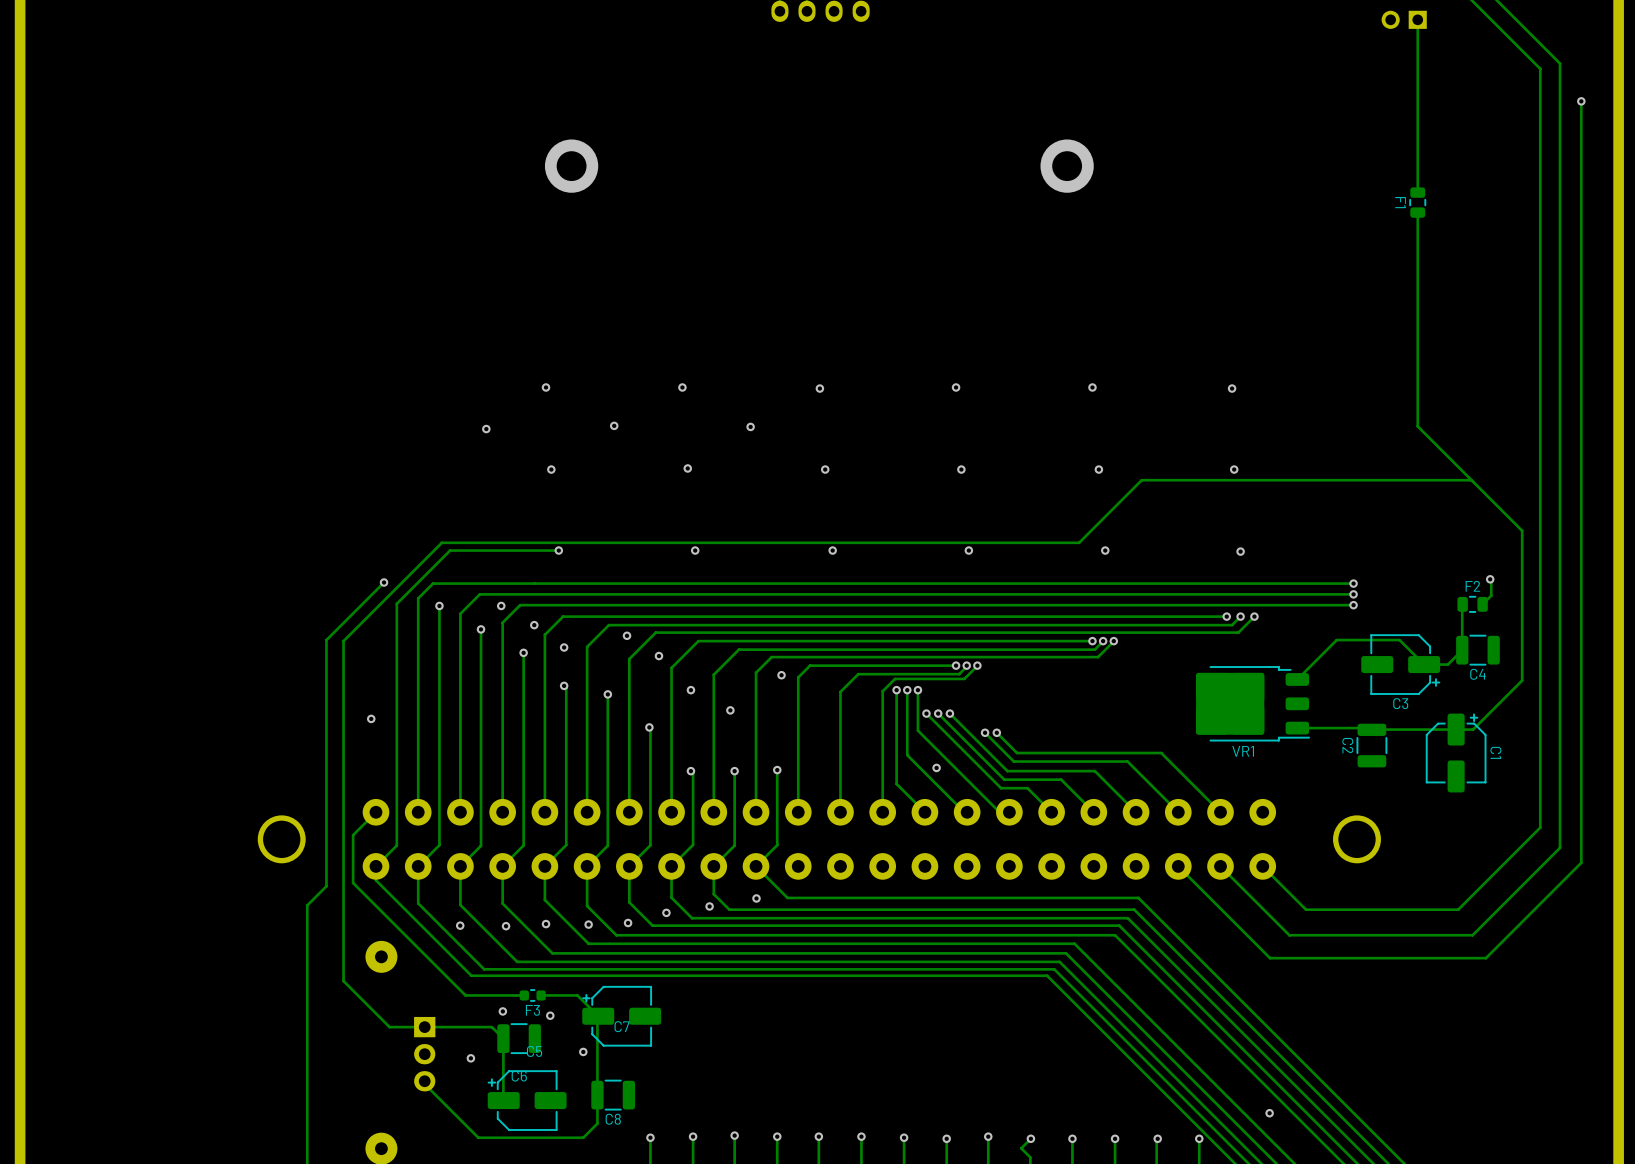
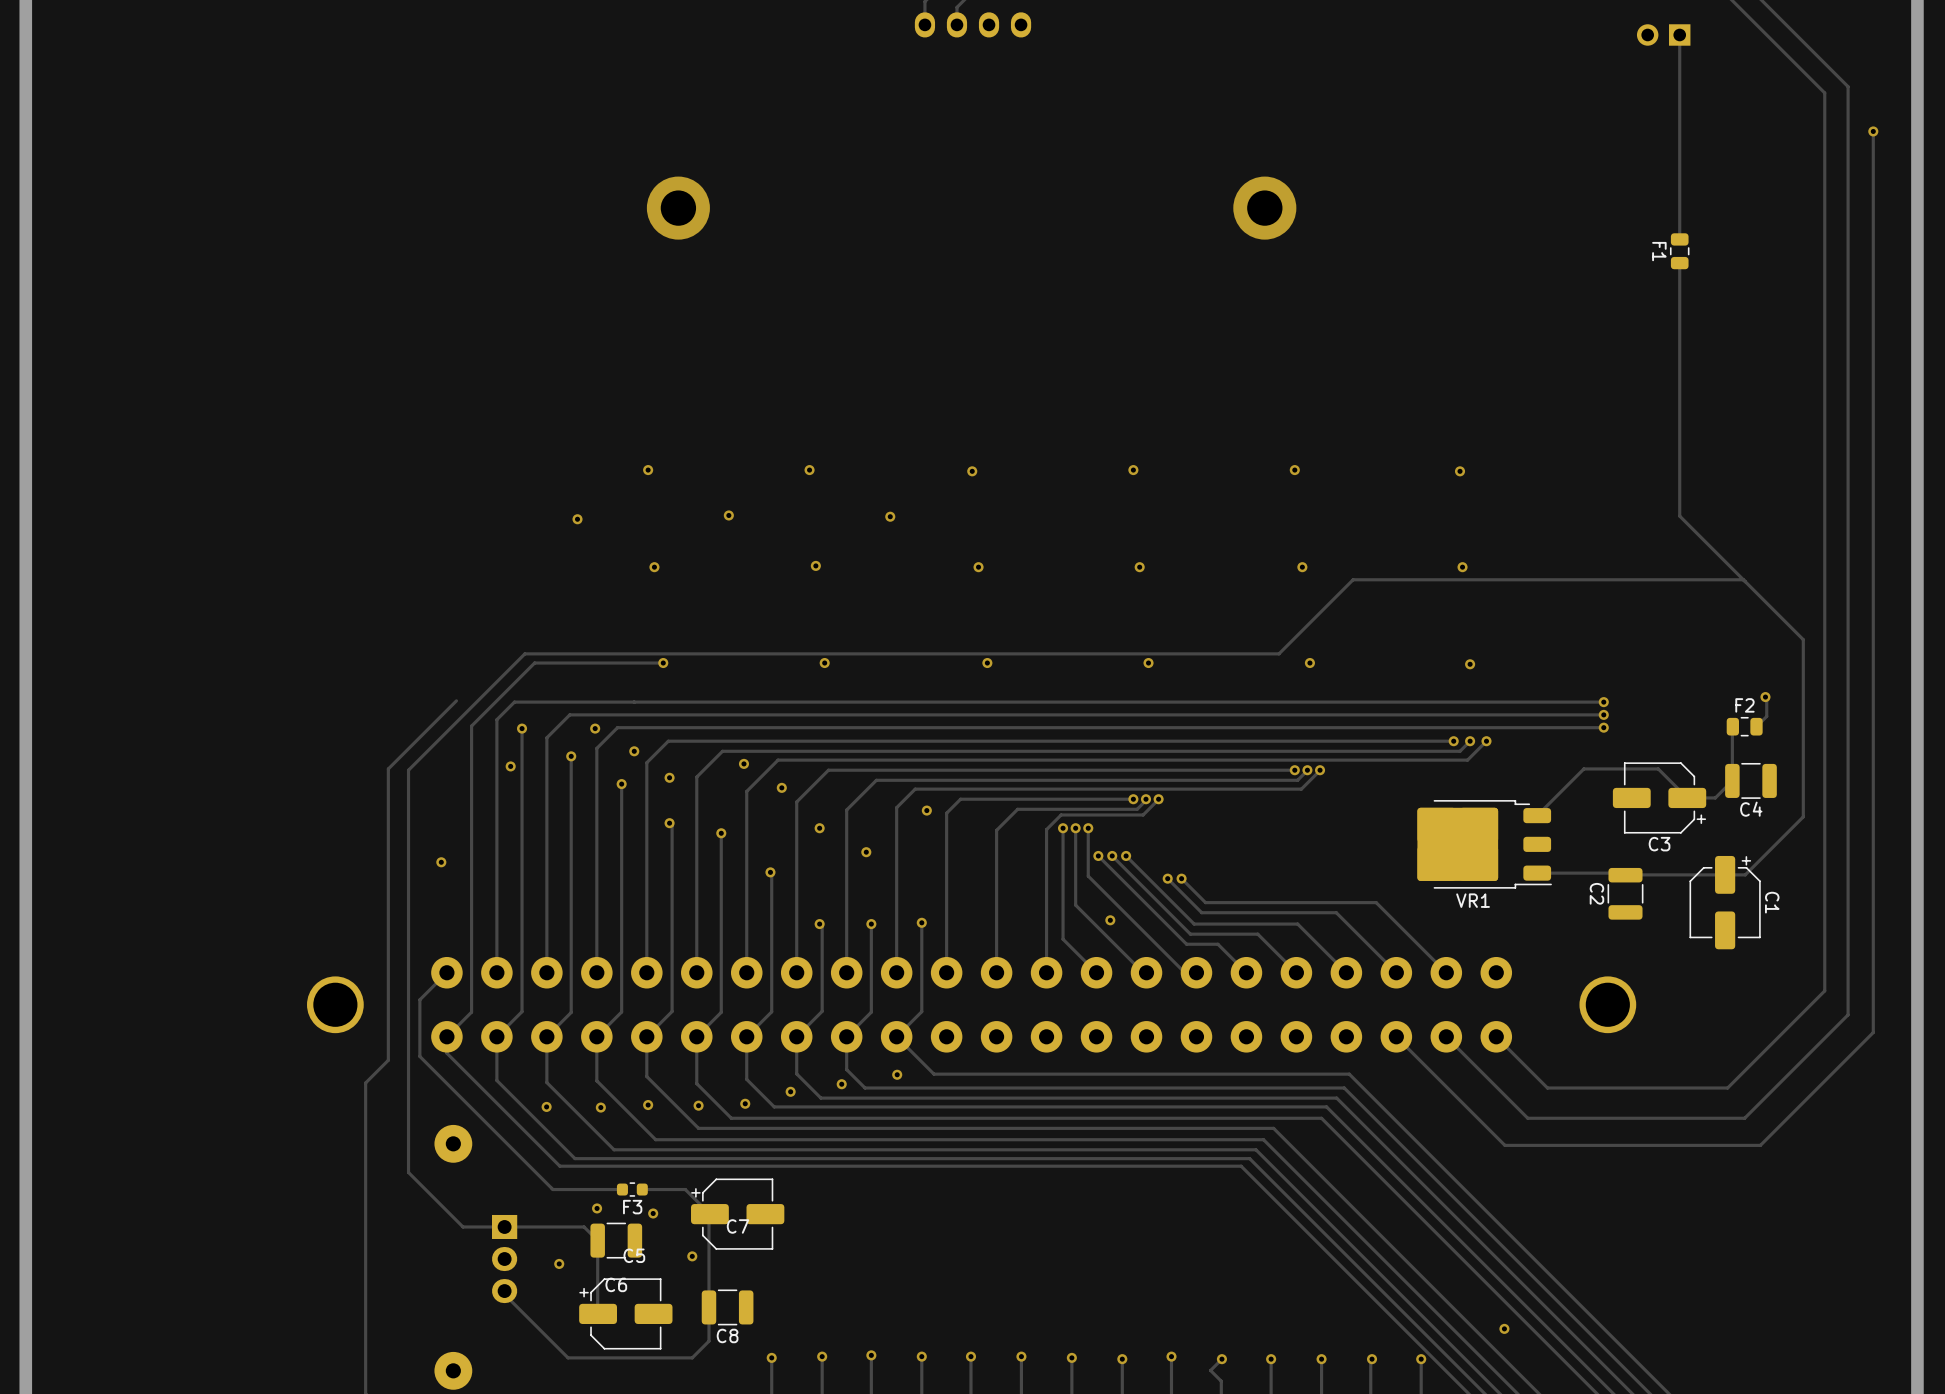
via: (384, 582) -> none
via: none -> (510, 766)

